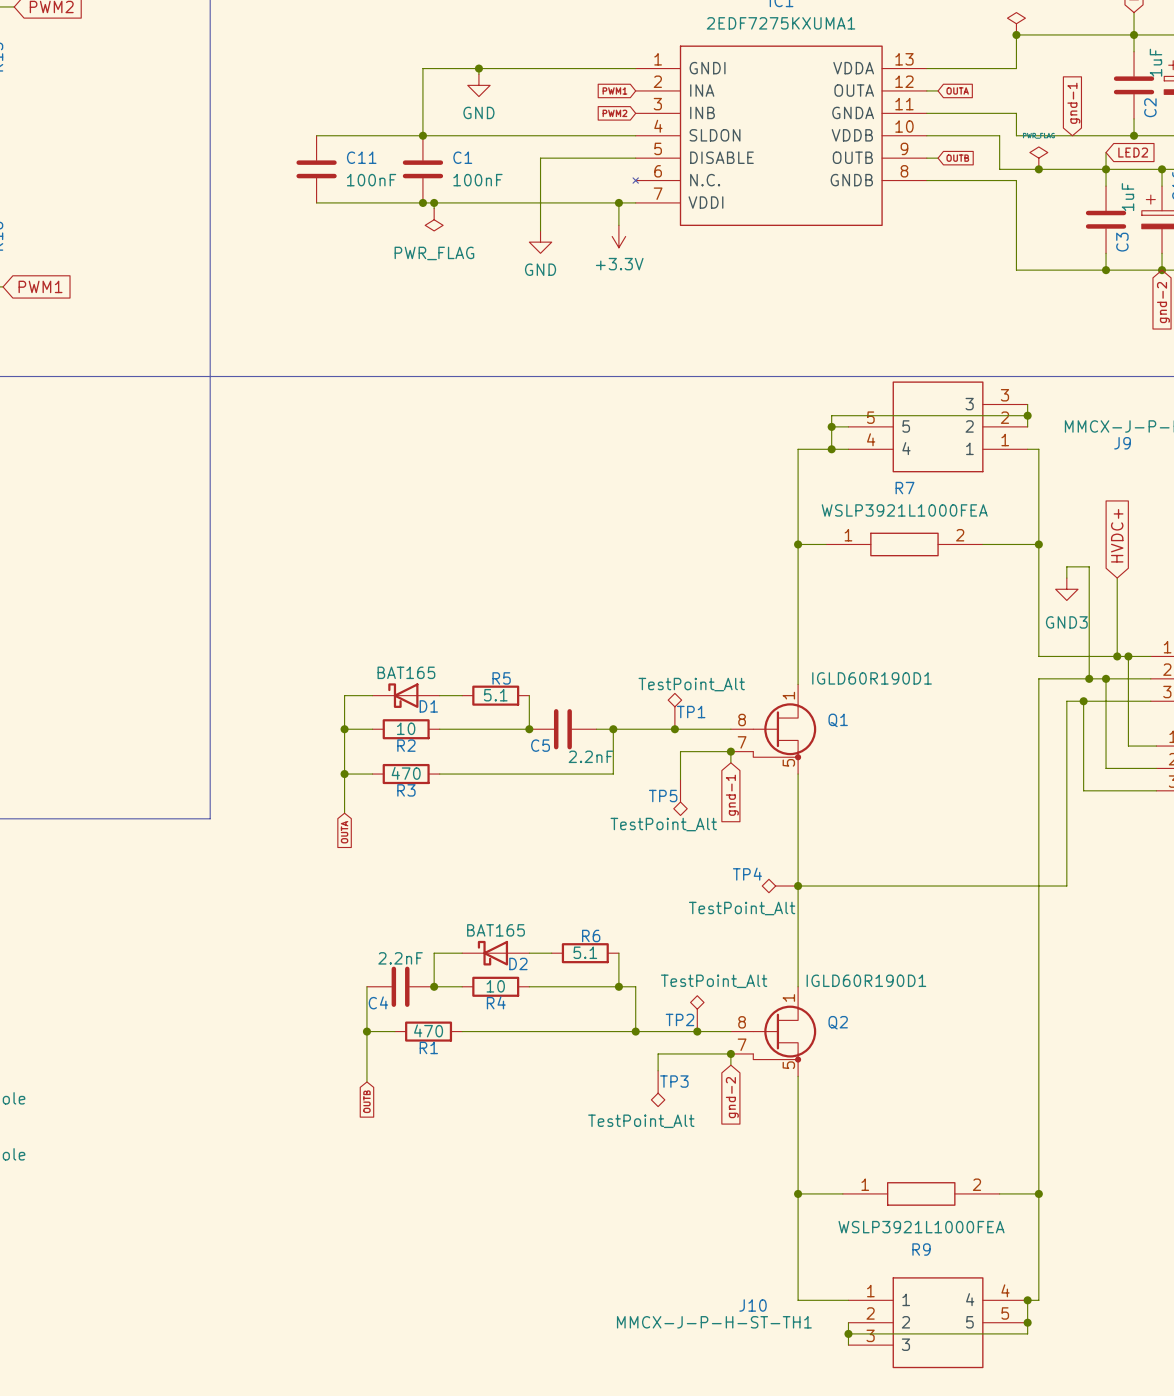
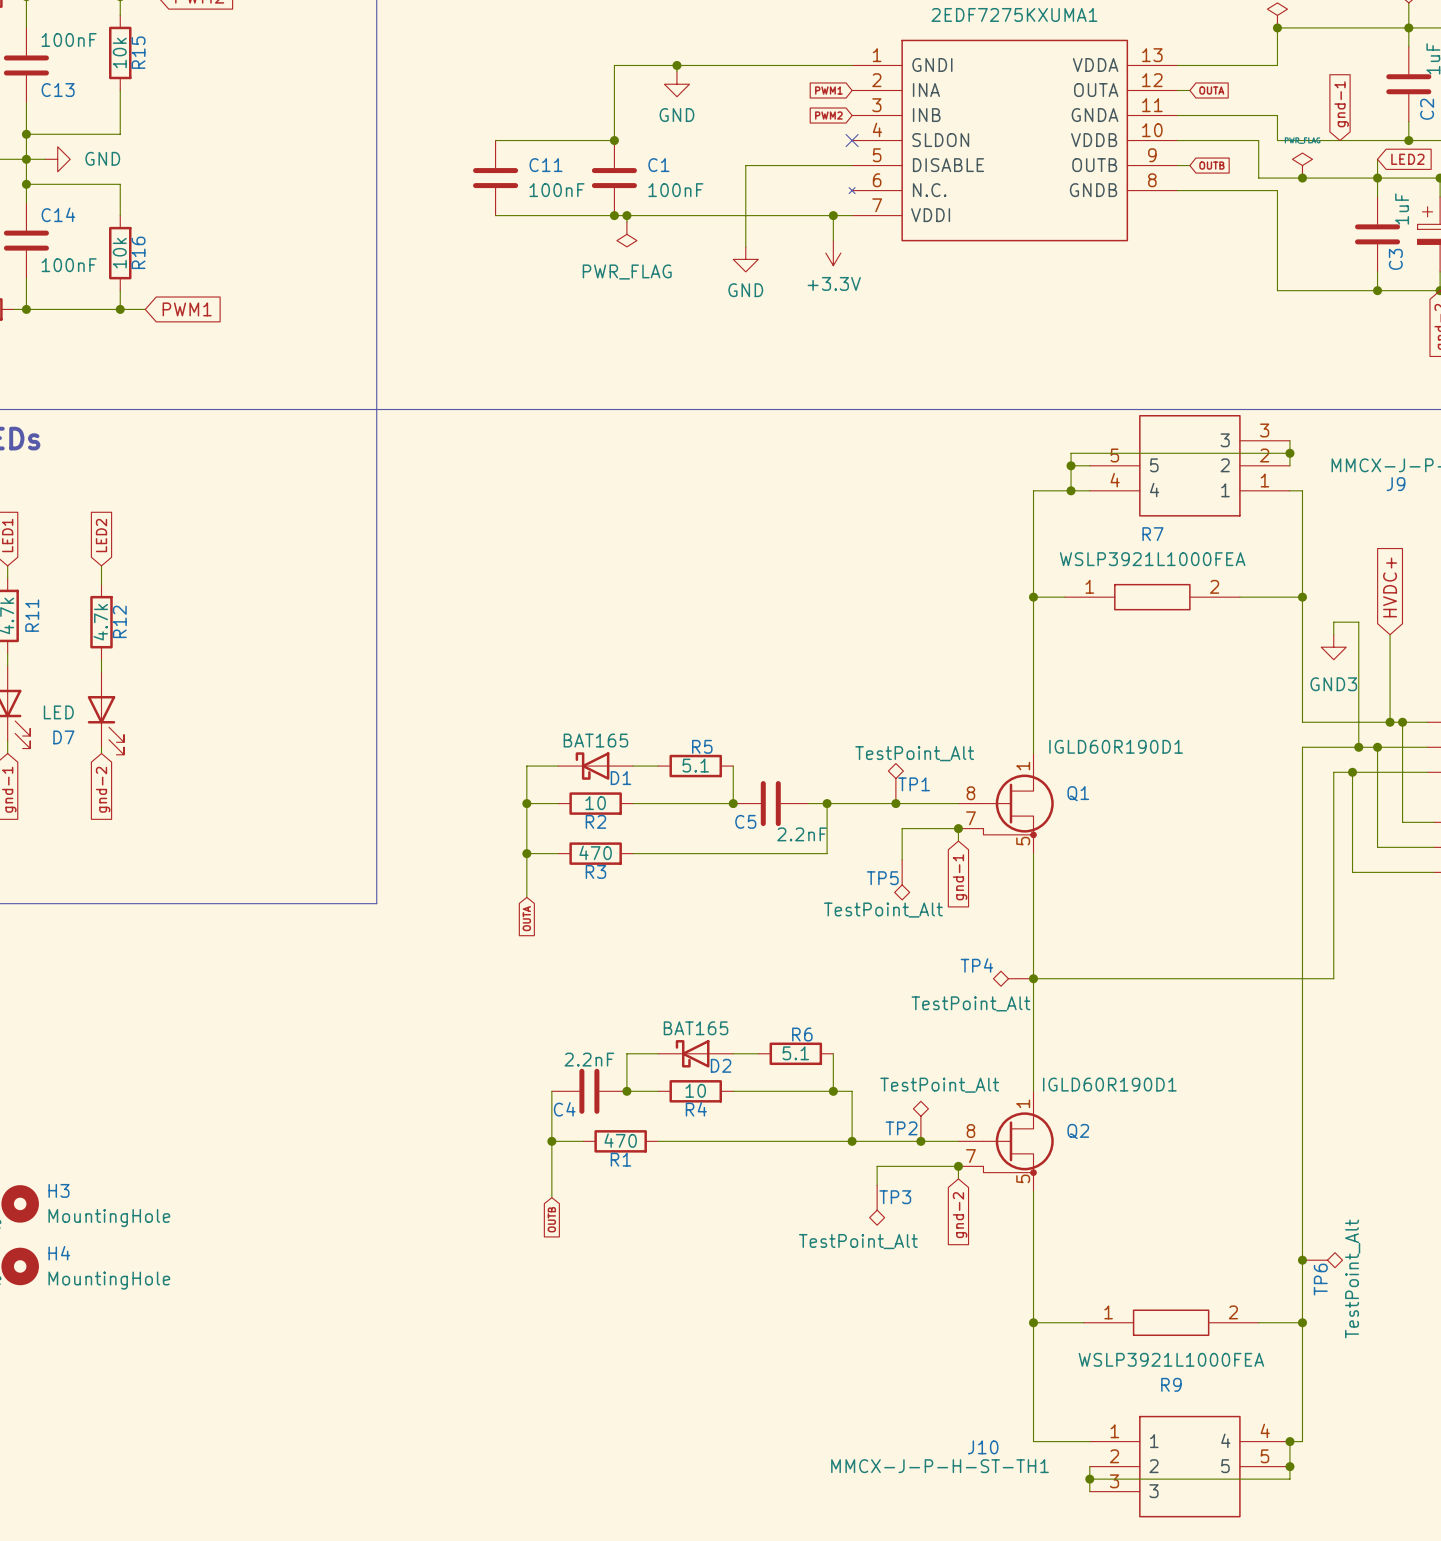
wire: (422, 135) (635, 135) -> none
no-connect mark: none -> (852, 140)
junction: none -> (1302, 1260)
TP6: none -> TestPoint_Alt (1322, 1260)

